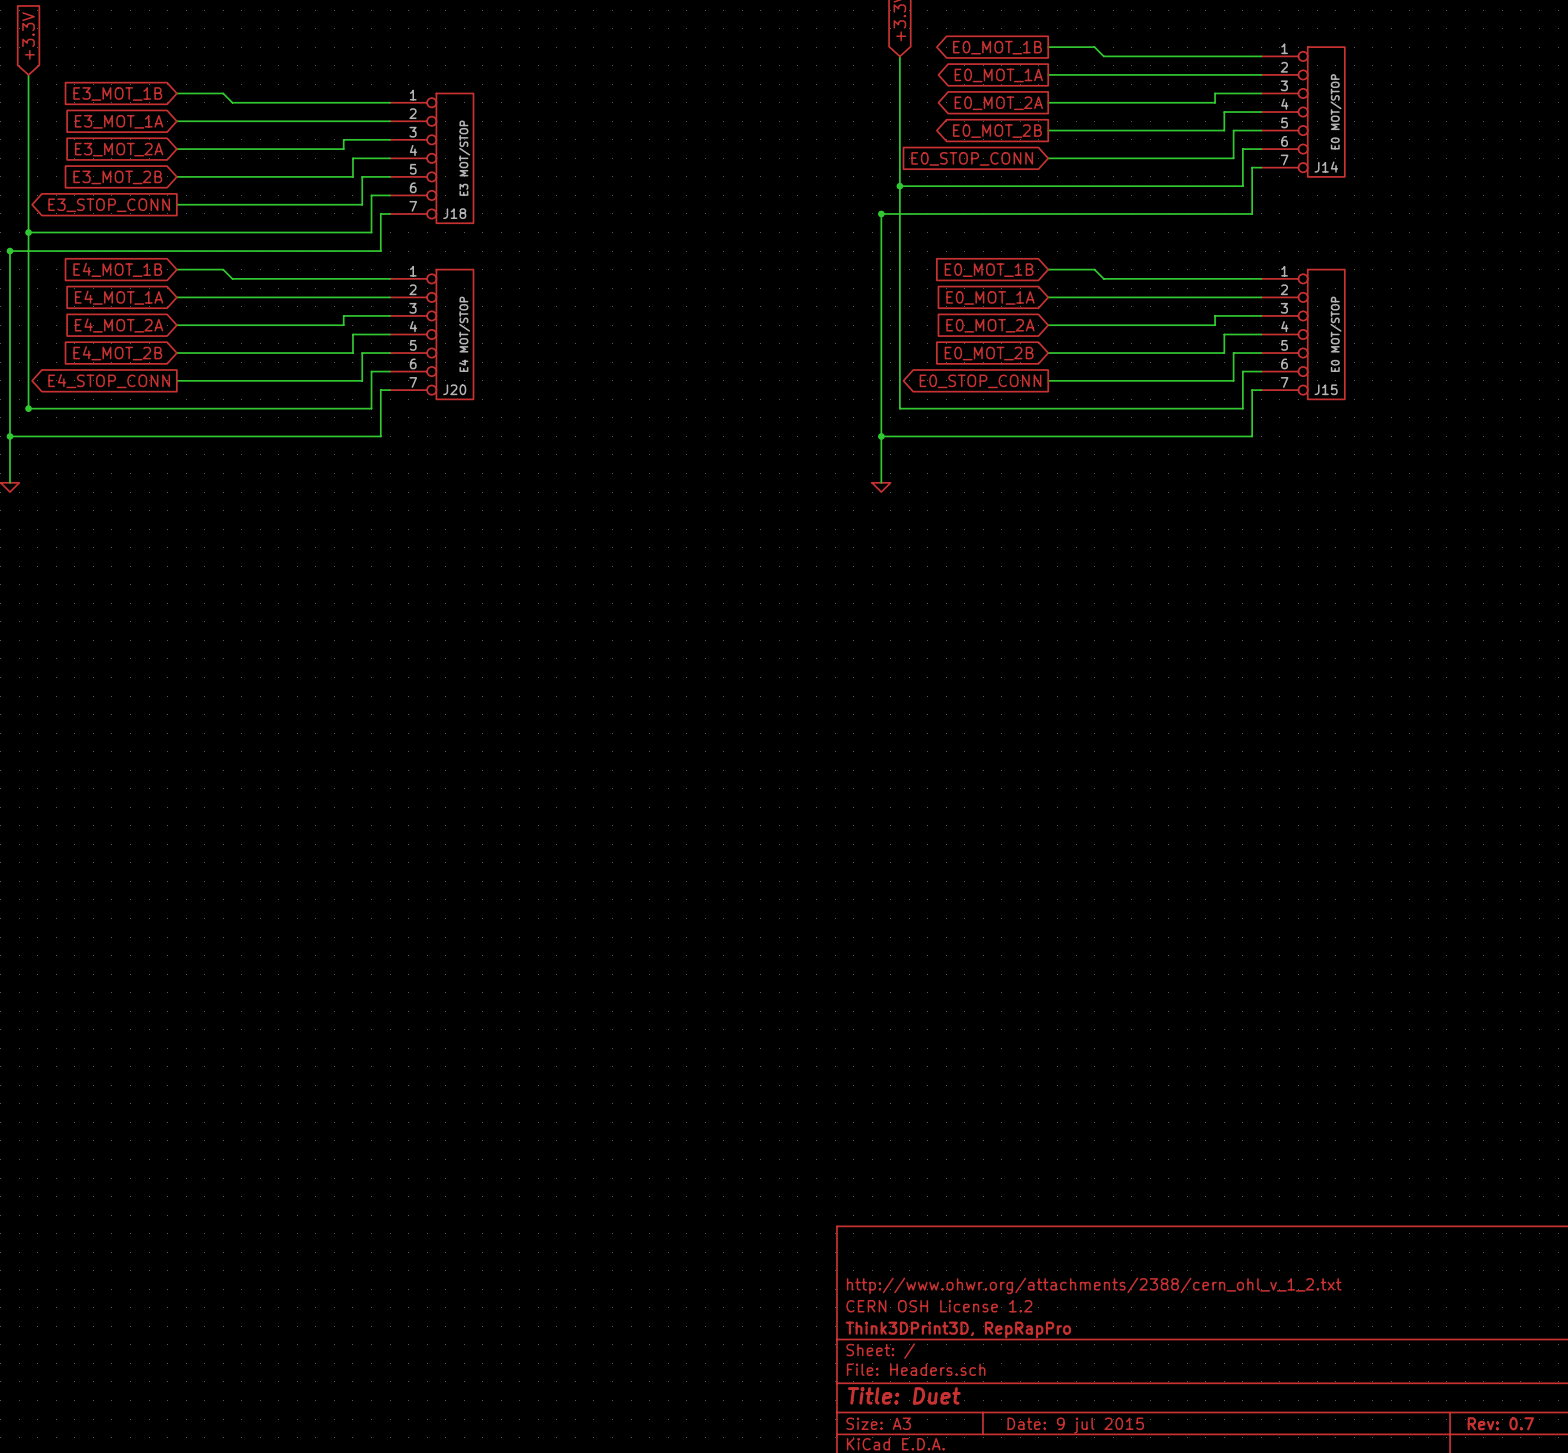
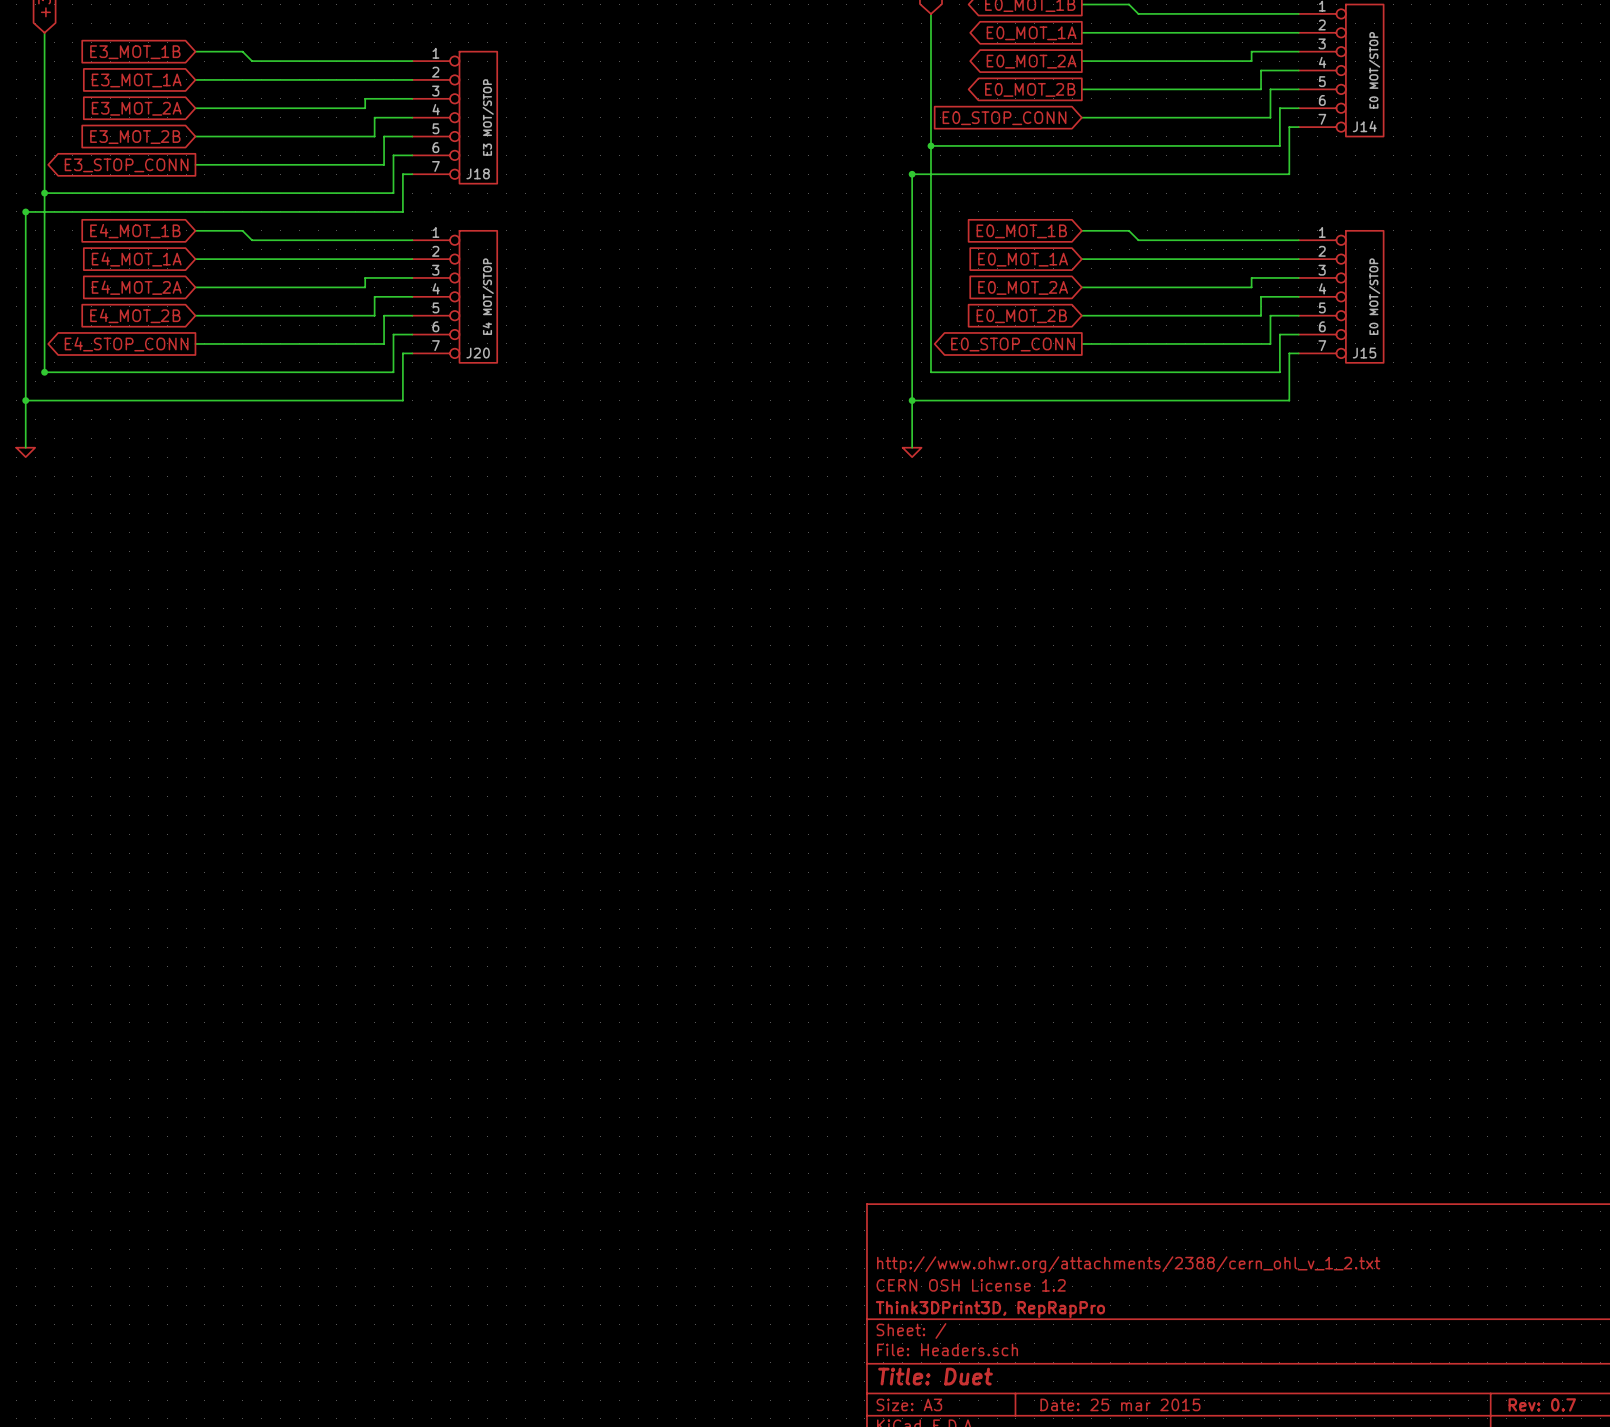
title block: Date: 9 jul 2015 (1075, 1425) -> Date: 25 mar 2015 (1120, 1404)

